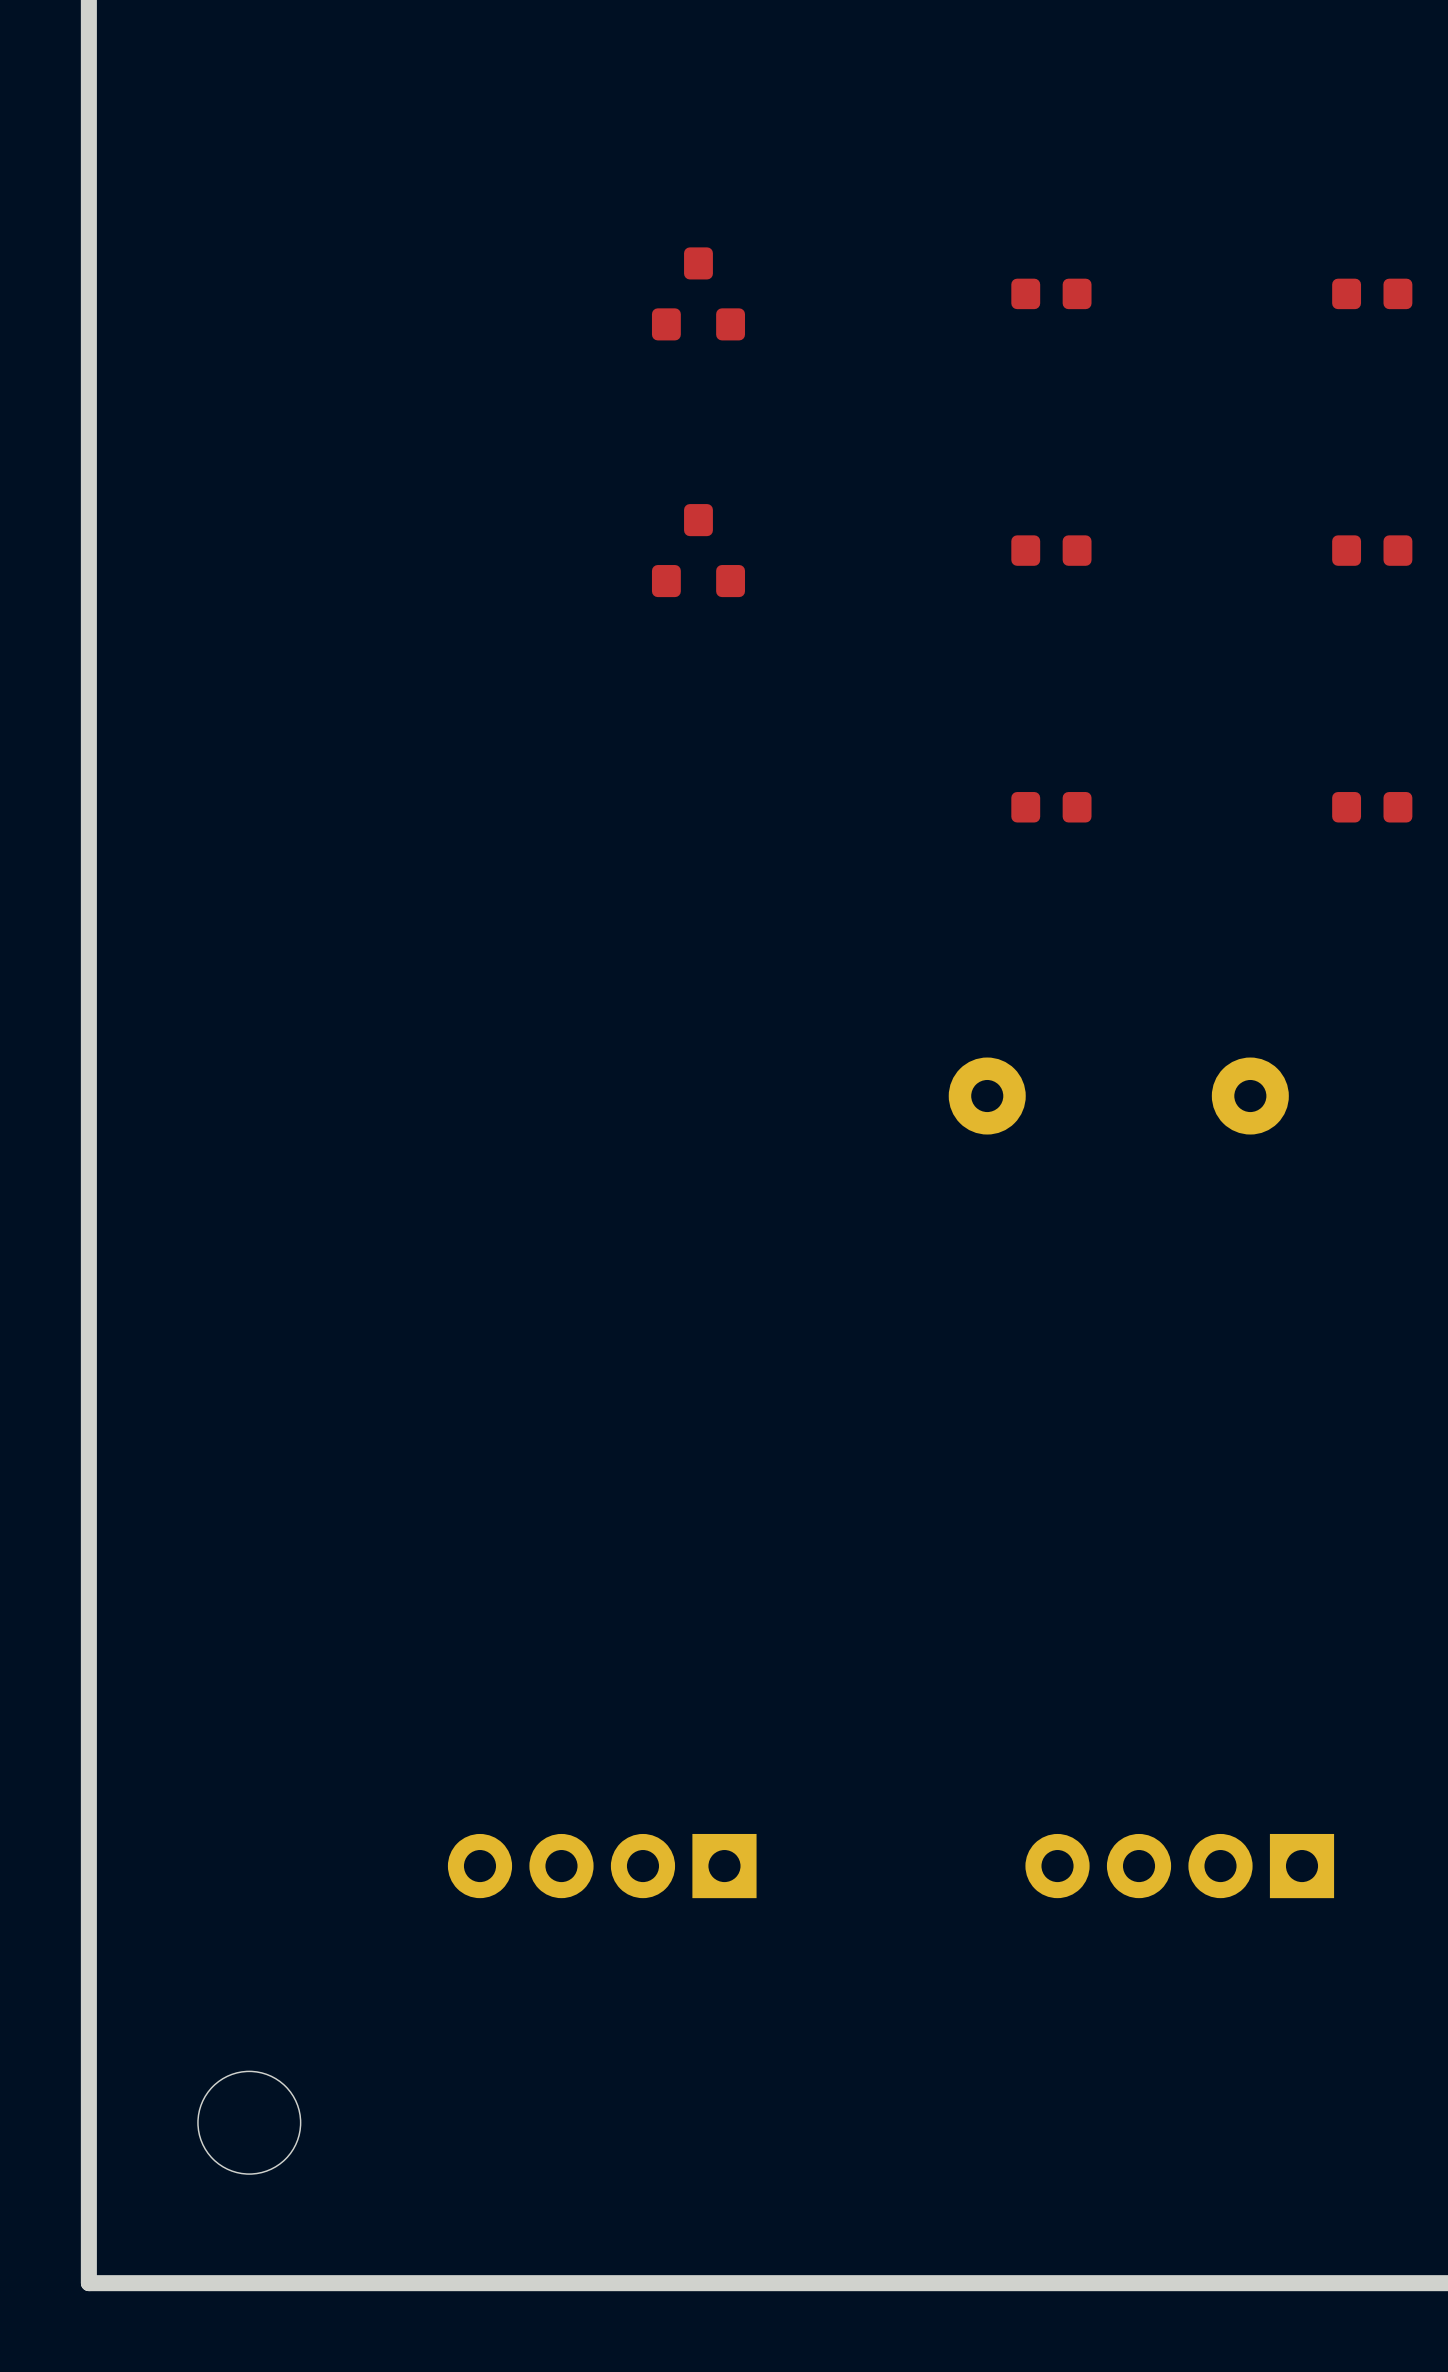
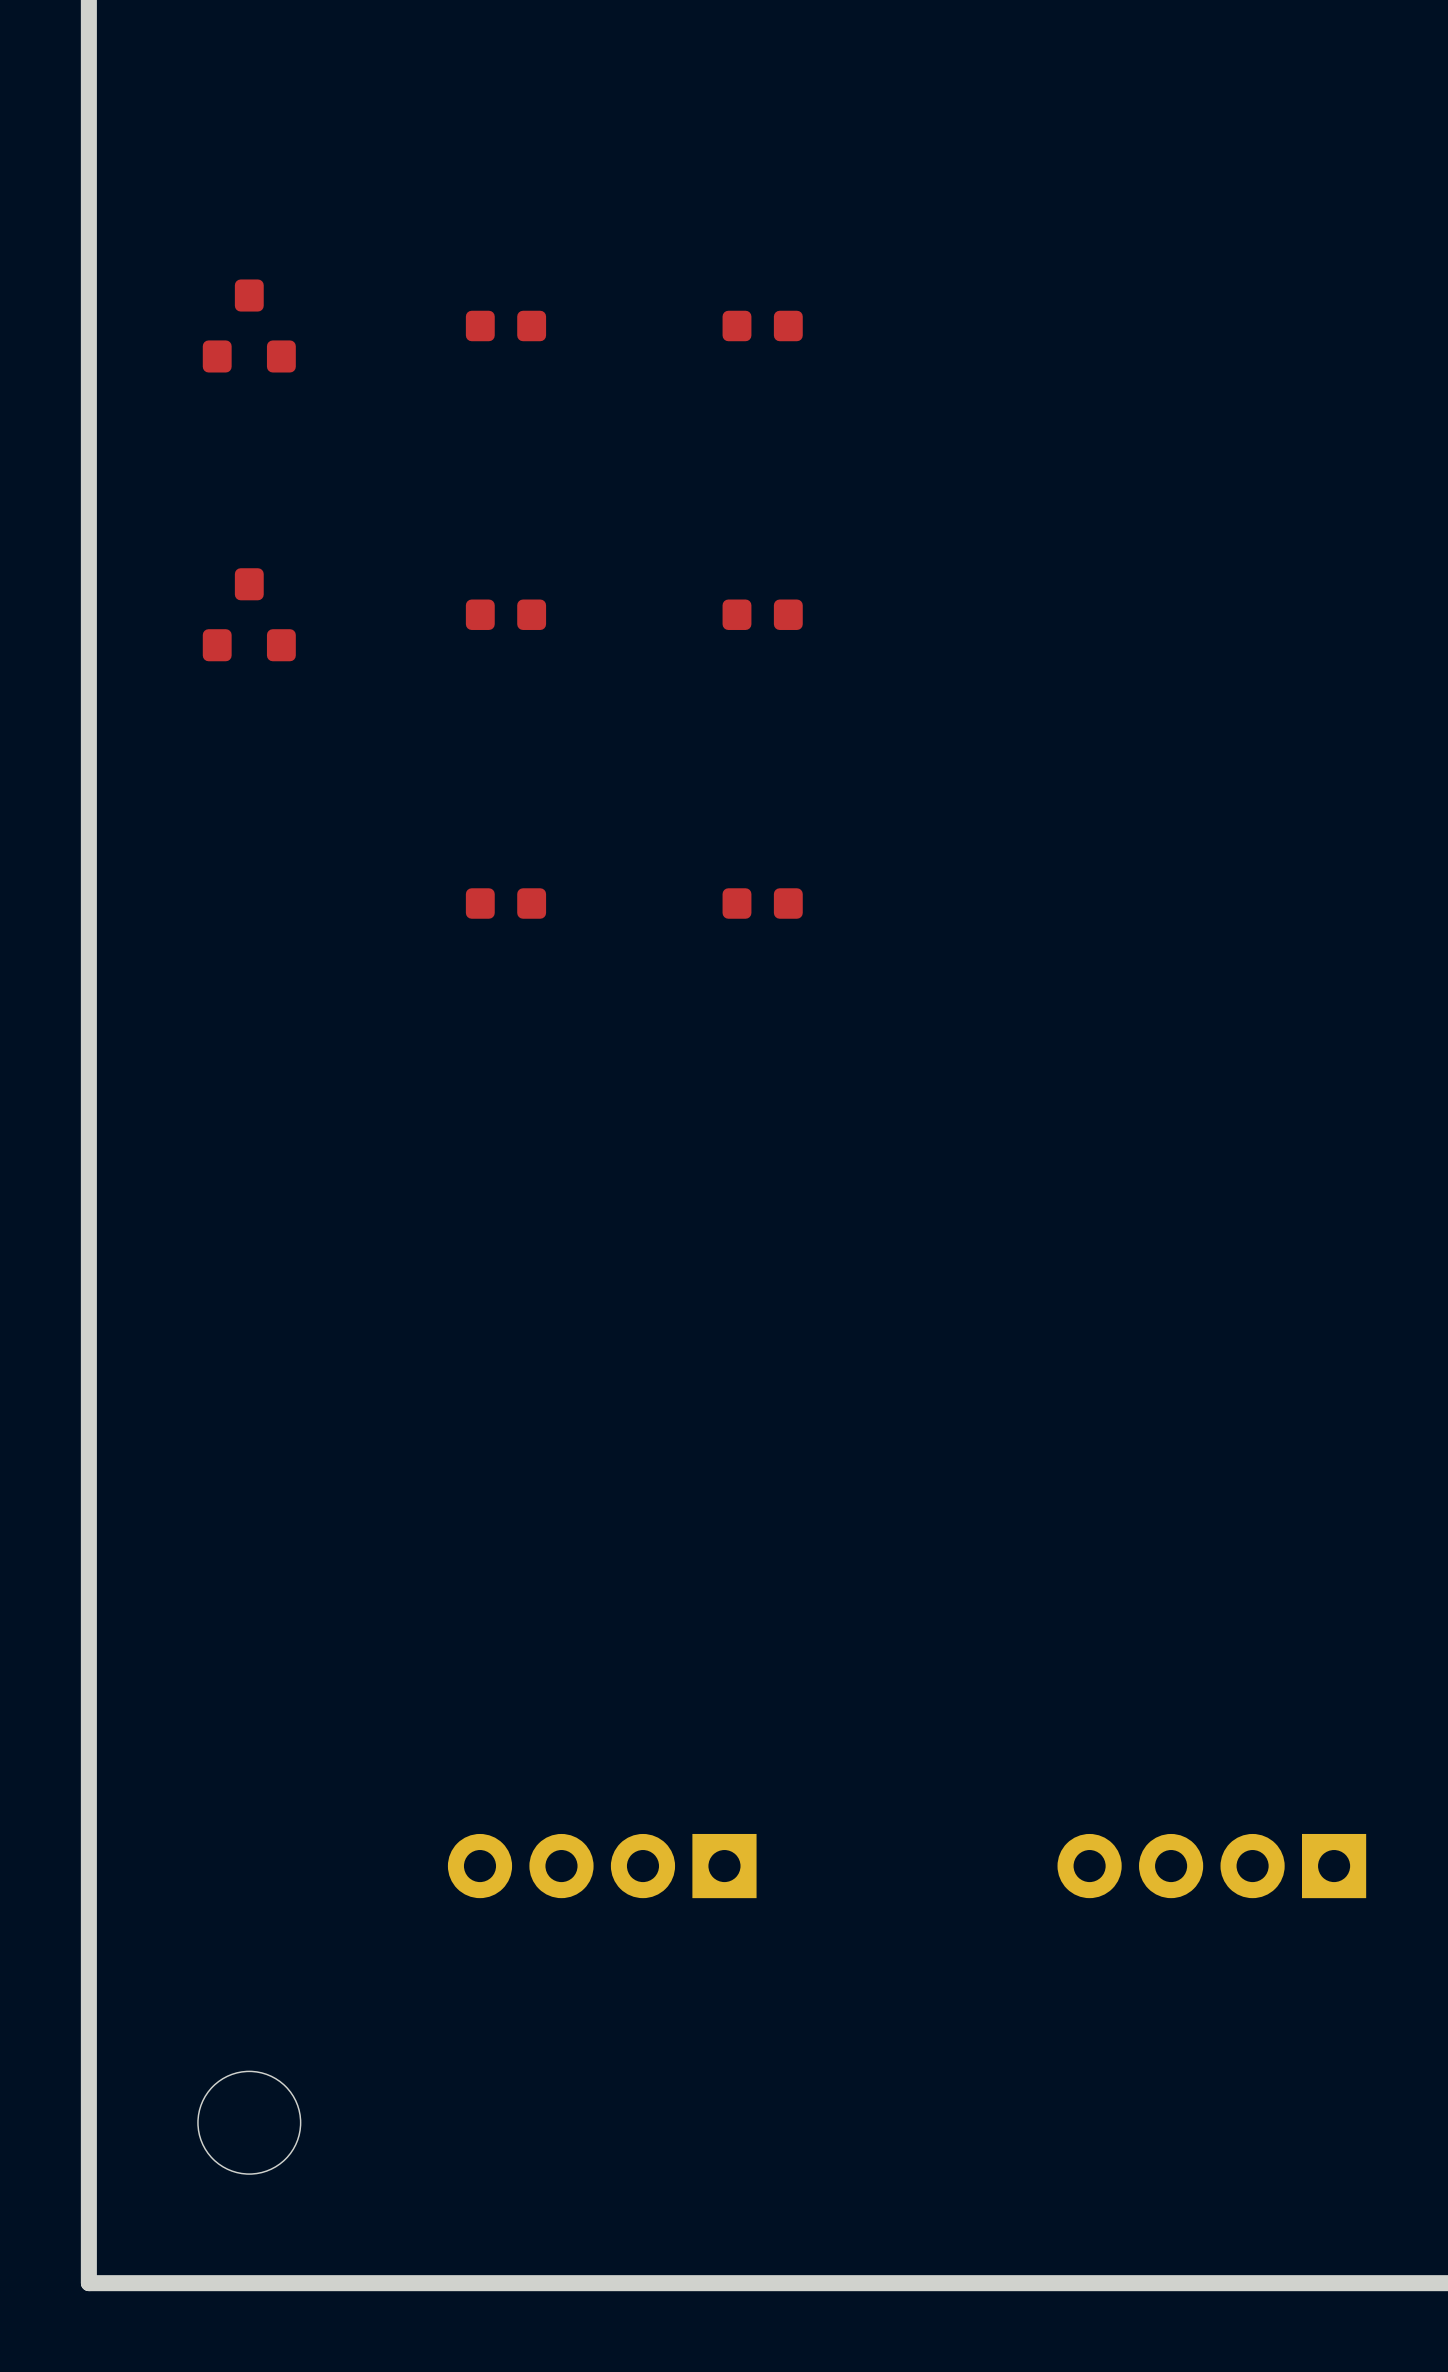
part: (698, 293) -> none
part: (1051, 293) -> none
part: (1372, 293) -> none
part: none -> (249, 325)
part: none -> (505, 325)
part: none -> (762, 325)
part: (698, 550) -> none
part: (1051, 550) -> none
part: (1372, 550) -> none
part: none -> (249, 614)
part: none -> (505, 614)
part: none -> (762, 614)
part: (1051, 807) -> none
part: (1372, 807) -> none
part: none -> (505, 903)
part: none -> (762, 903)
part: (987, 1096) -> none
part: (1250, 1096) -> none
part position: (1179, 1866) -> (1211, 1866)

